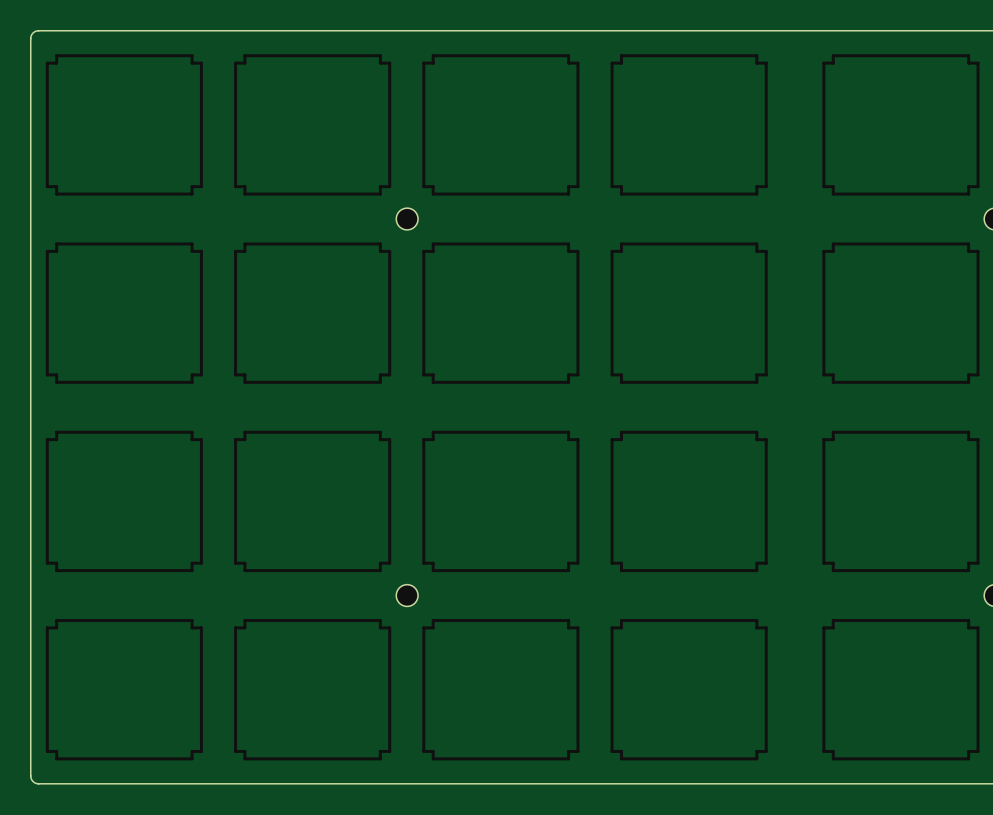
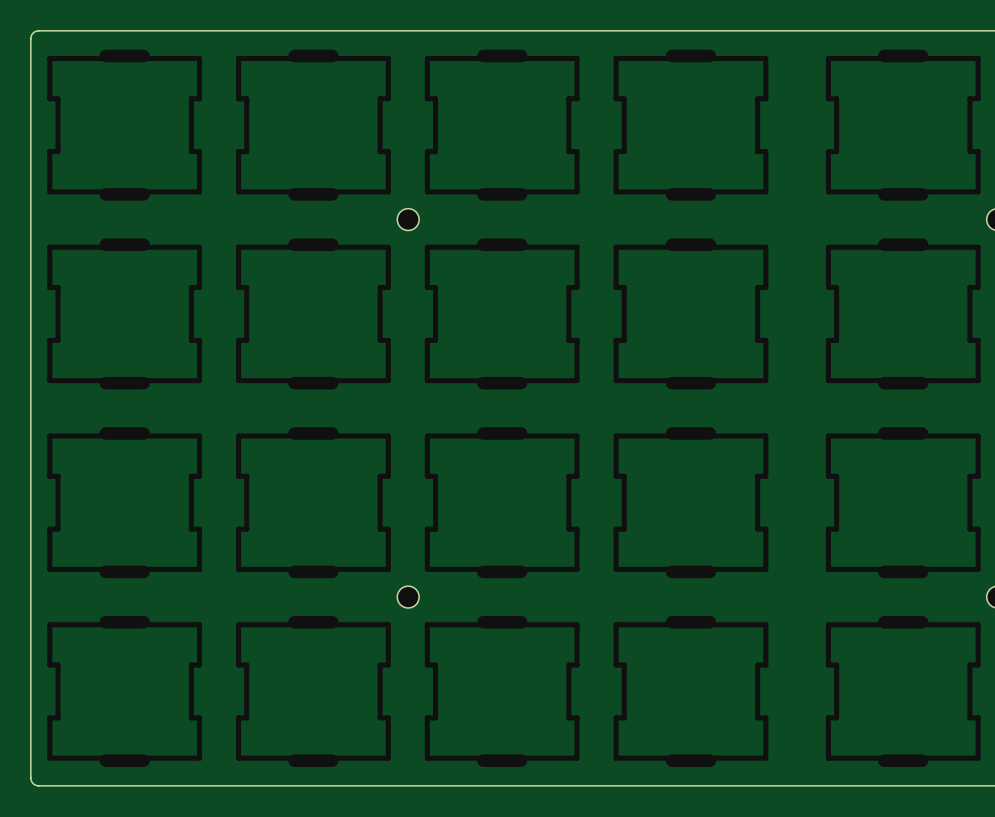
part footprint: [45, 54, 203, 196] -> [47, 49, 203, 201]
part footprint: [234, 54, 392, 196] -> [236, 49, 391, 201]
part footprint: [422, 54, 580, 196] -> [424, 49, 580, 201]
part footprint: [610, 54, 768, 196] -> [613, 49, 769, 201]
part footprint: [822, 54, 980, 196] -> [825, 49, 981, 201]
part footprint: [45, 242, 203, 384] -> [47, 238, 203, 390]
part footprint: [234, 242, 392, 384] -> [236, 238, 391, 390]
part footprint: [422, 242, 580, 384] -> [424, 238, 580, 390]
part footprint: [610, 242, 768, 384] -> [613, 238, 769, 390]
part footprint: [822, 242, 980, 384] -> [825, 238, 981, 390]
part footprint: [45, 430, 203, 573] -> [47, 427, 203, 579]
part footprint: [234, 430, 392, 573] -> [236, 427, 391, 579]
part footprint: [422, 430, 580, 573] -> [424, 427, 580, 579]
part footprint: [610, 430, 768, 573] -> [613, 427, 769, 579]
part footprint: [822, 430, 980, 573] -> [825, 427, 981, 579]
part footprint: [45, 619, 203, 761] -> [47, 615, 203, 767]
part footprint: [234, 619, 392, 761] -> [236, 615, 391, 767]
part footprint: [422, 619, 580, 761] -> [424, 615, 580, 767]
part footprint: [610, 619, 768, 761] -> [613, 615, 769, 767]
part footprint: [822, 619, 980, 761] -> [825, 615, 981, 767]

